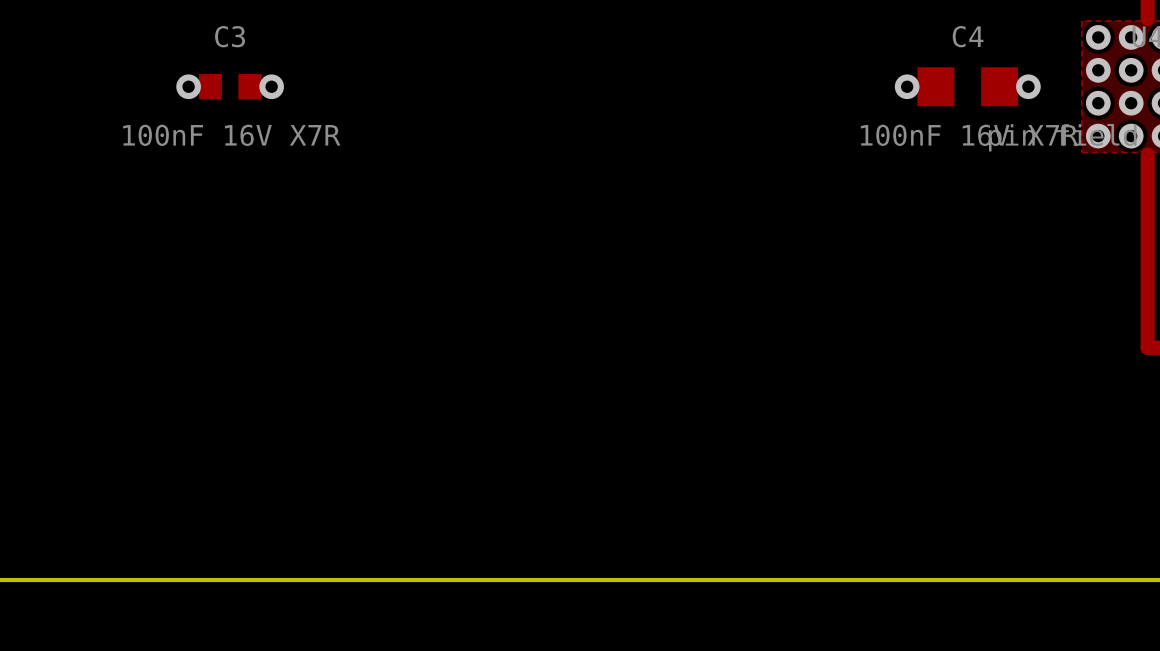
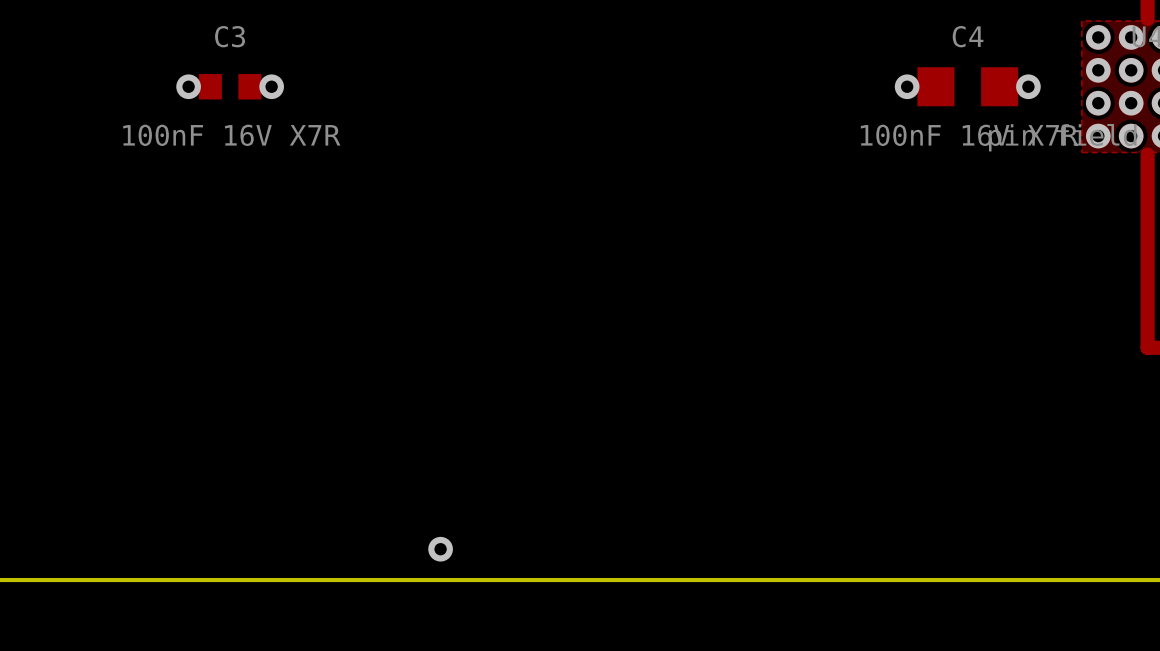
via: none -> (440, 549)

